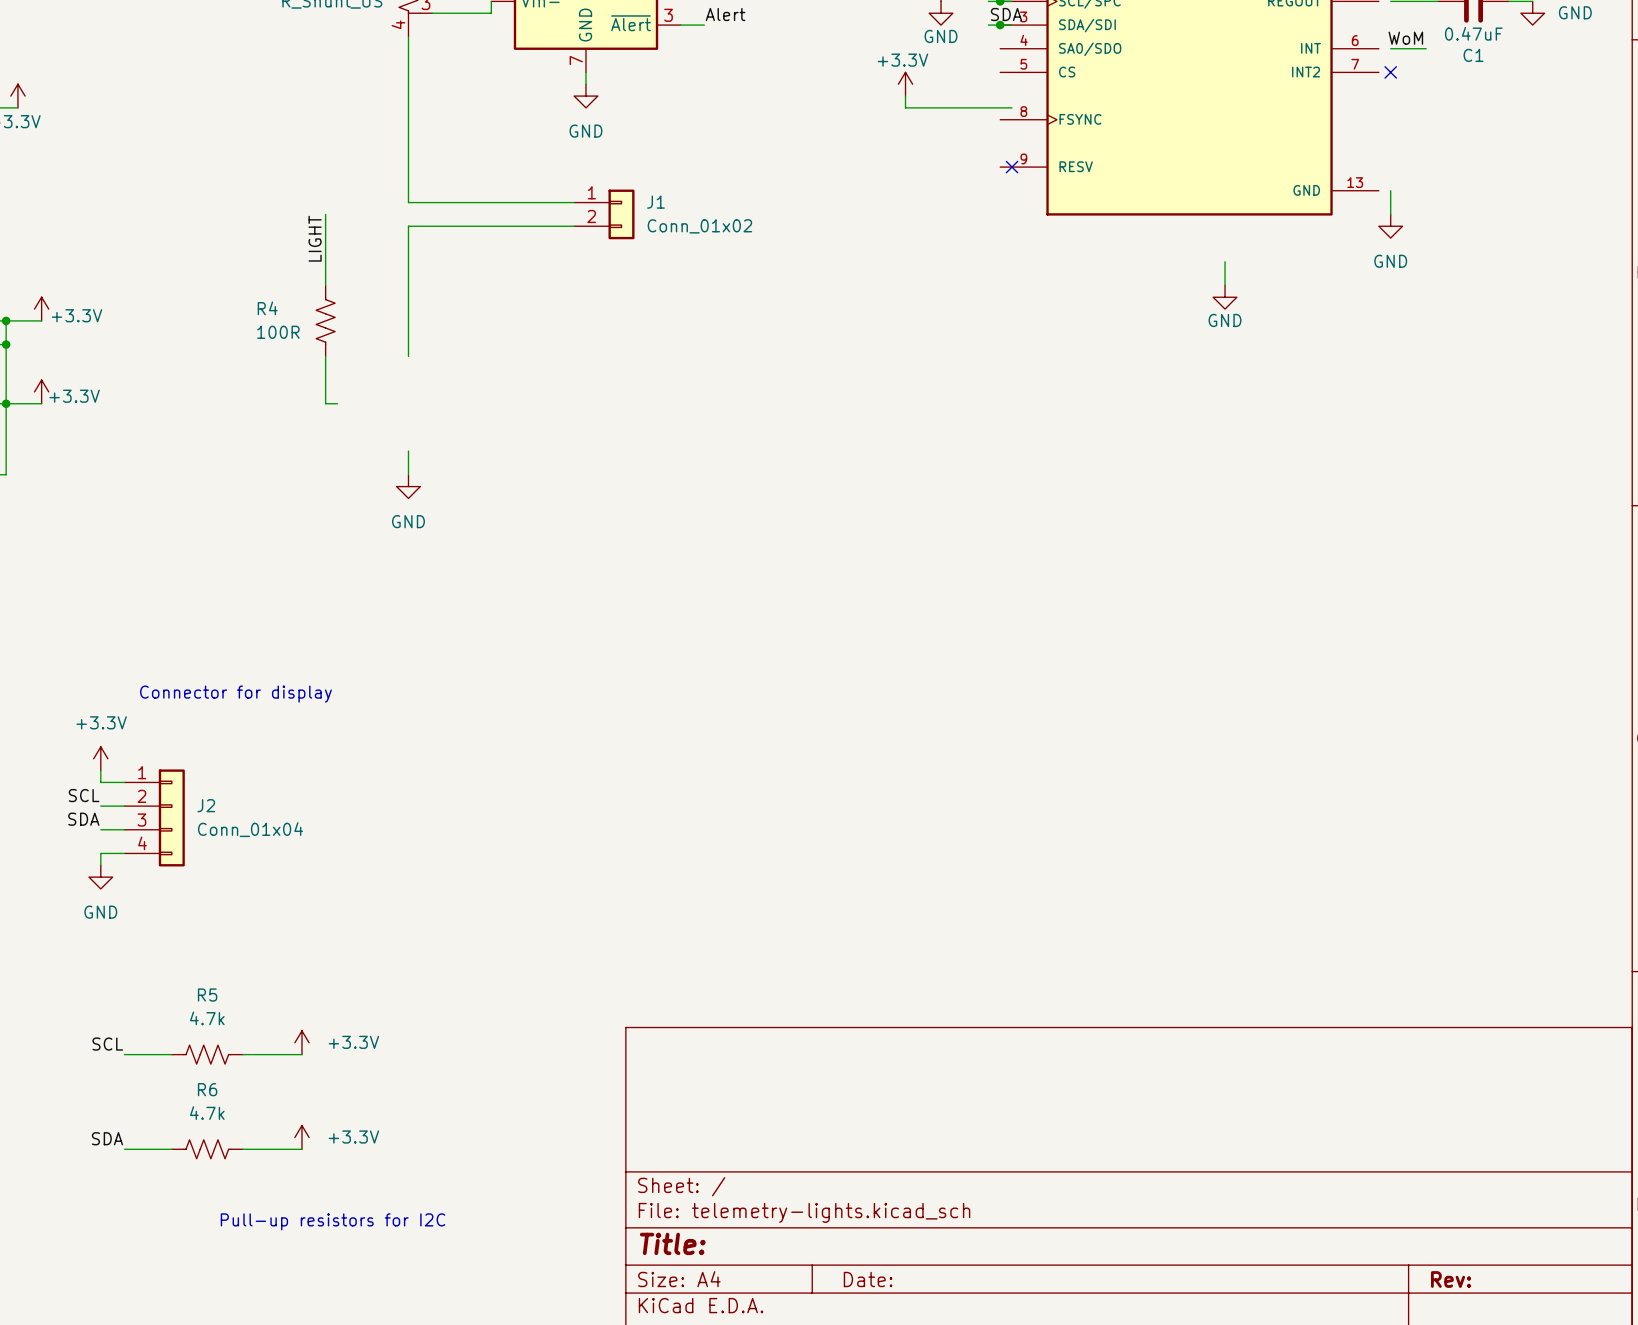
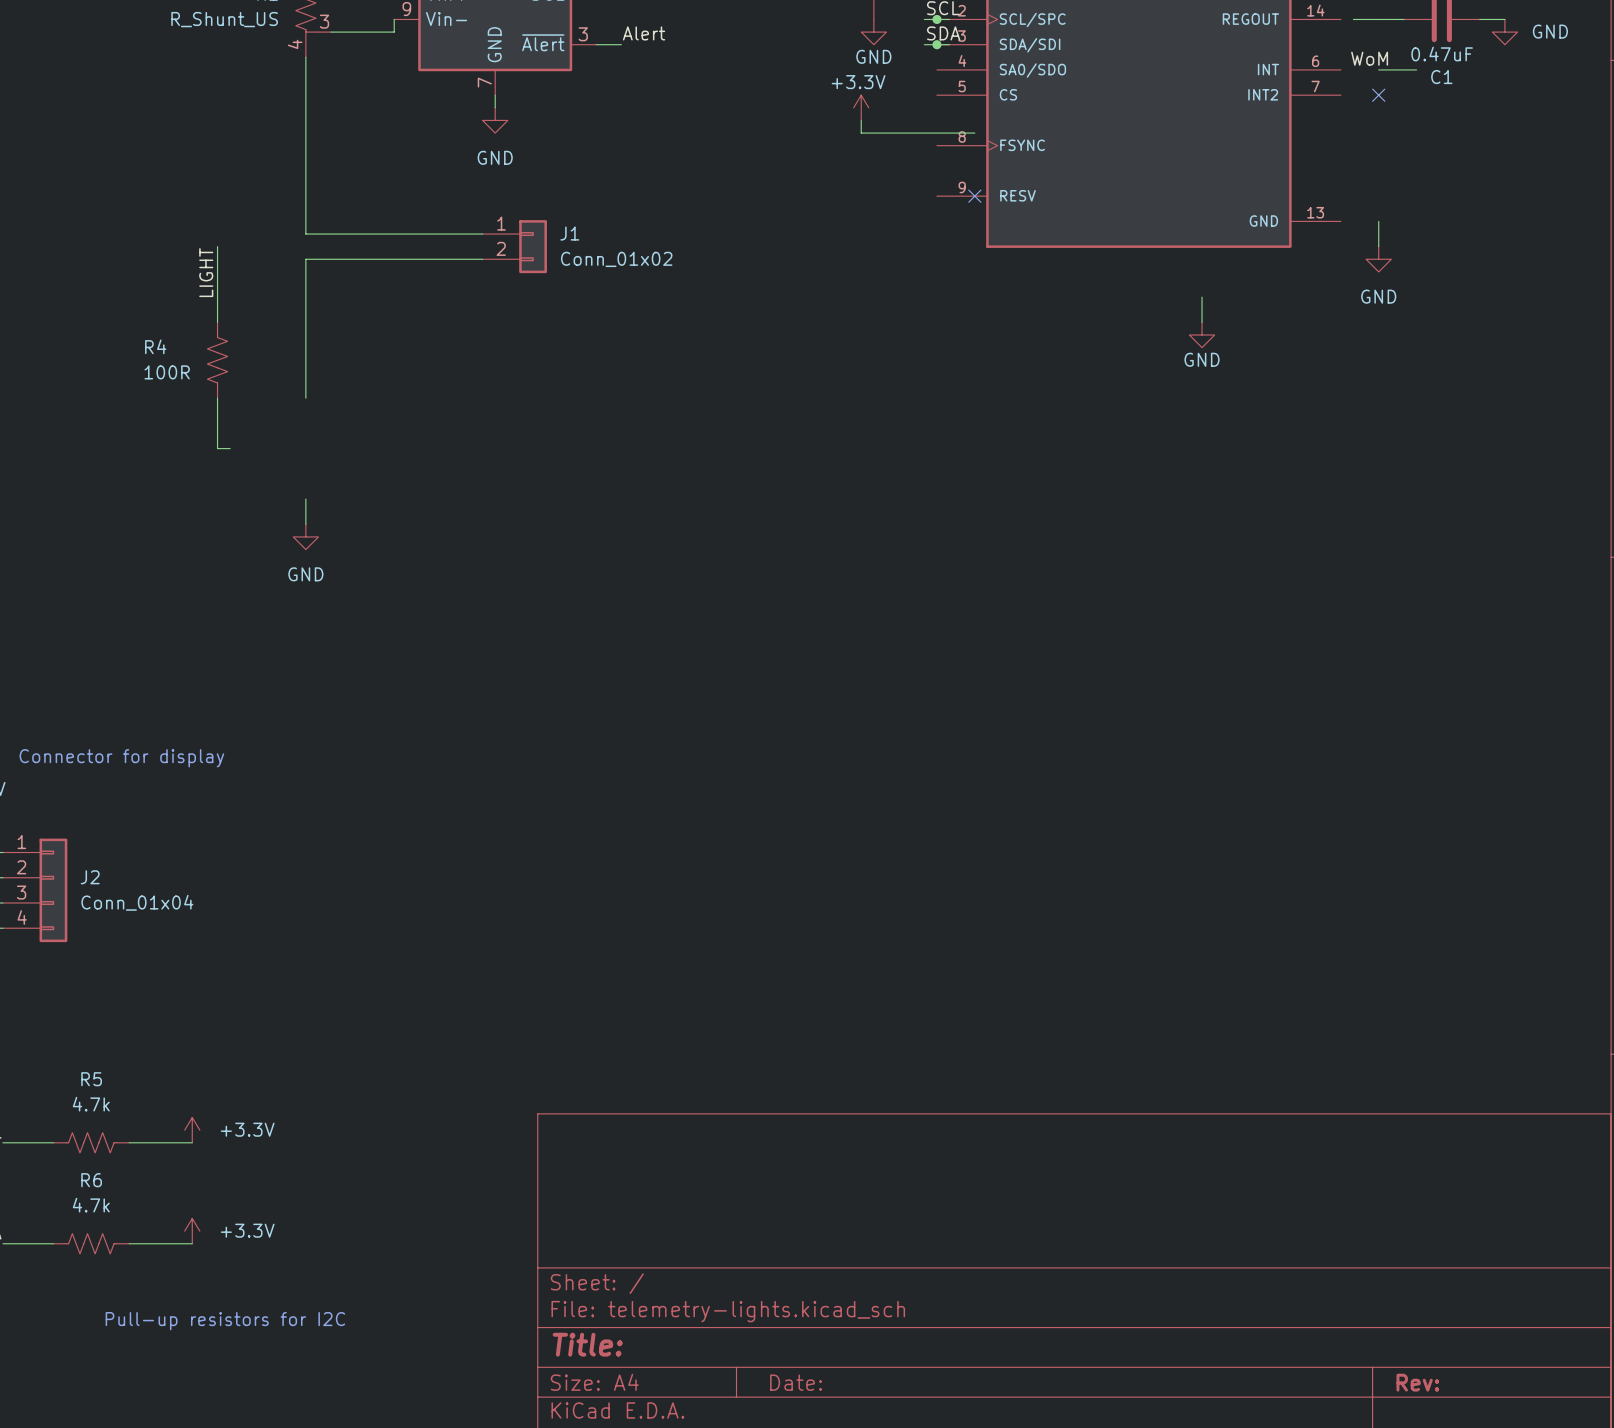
wire: (1390, 48) (1414, 48) -> (1391, 69) (1416, 69)
no-connect mark position: (1390, 72) -> (1378, 95)
power symbol position: +3.3V (905, 84) -> +3.3V (861, 107)
wire: (905, 96) (905, 107) (929, 107) -> (861, 120) (861, 133)
wire: none -> (949, 133) (974, 133)
no-connect mark position: (1012, 167) -> (974, 196)
wire: (1390, 190) (1390, 214) -> (1378, 221) (1378, 246)
power symbol position: GND (1390, 226) -> GND (1378, 259)
wire: (1225, 261) (1225, 285) -> (1202, 297) (1202, 322)
power symbol position: GND (1225, 297) -> GND (1202, 335)

